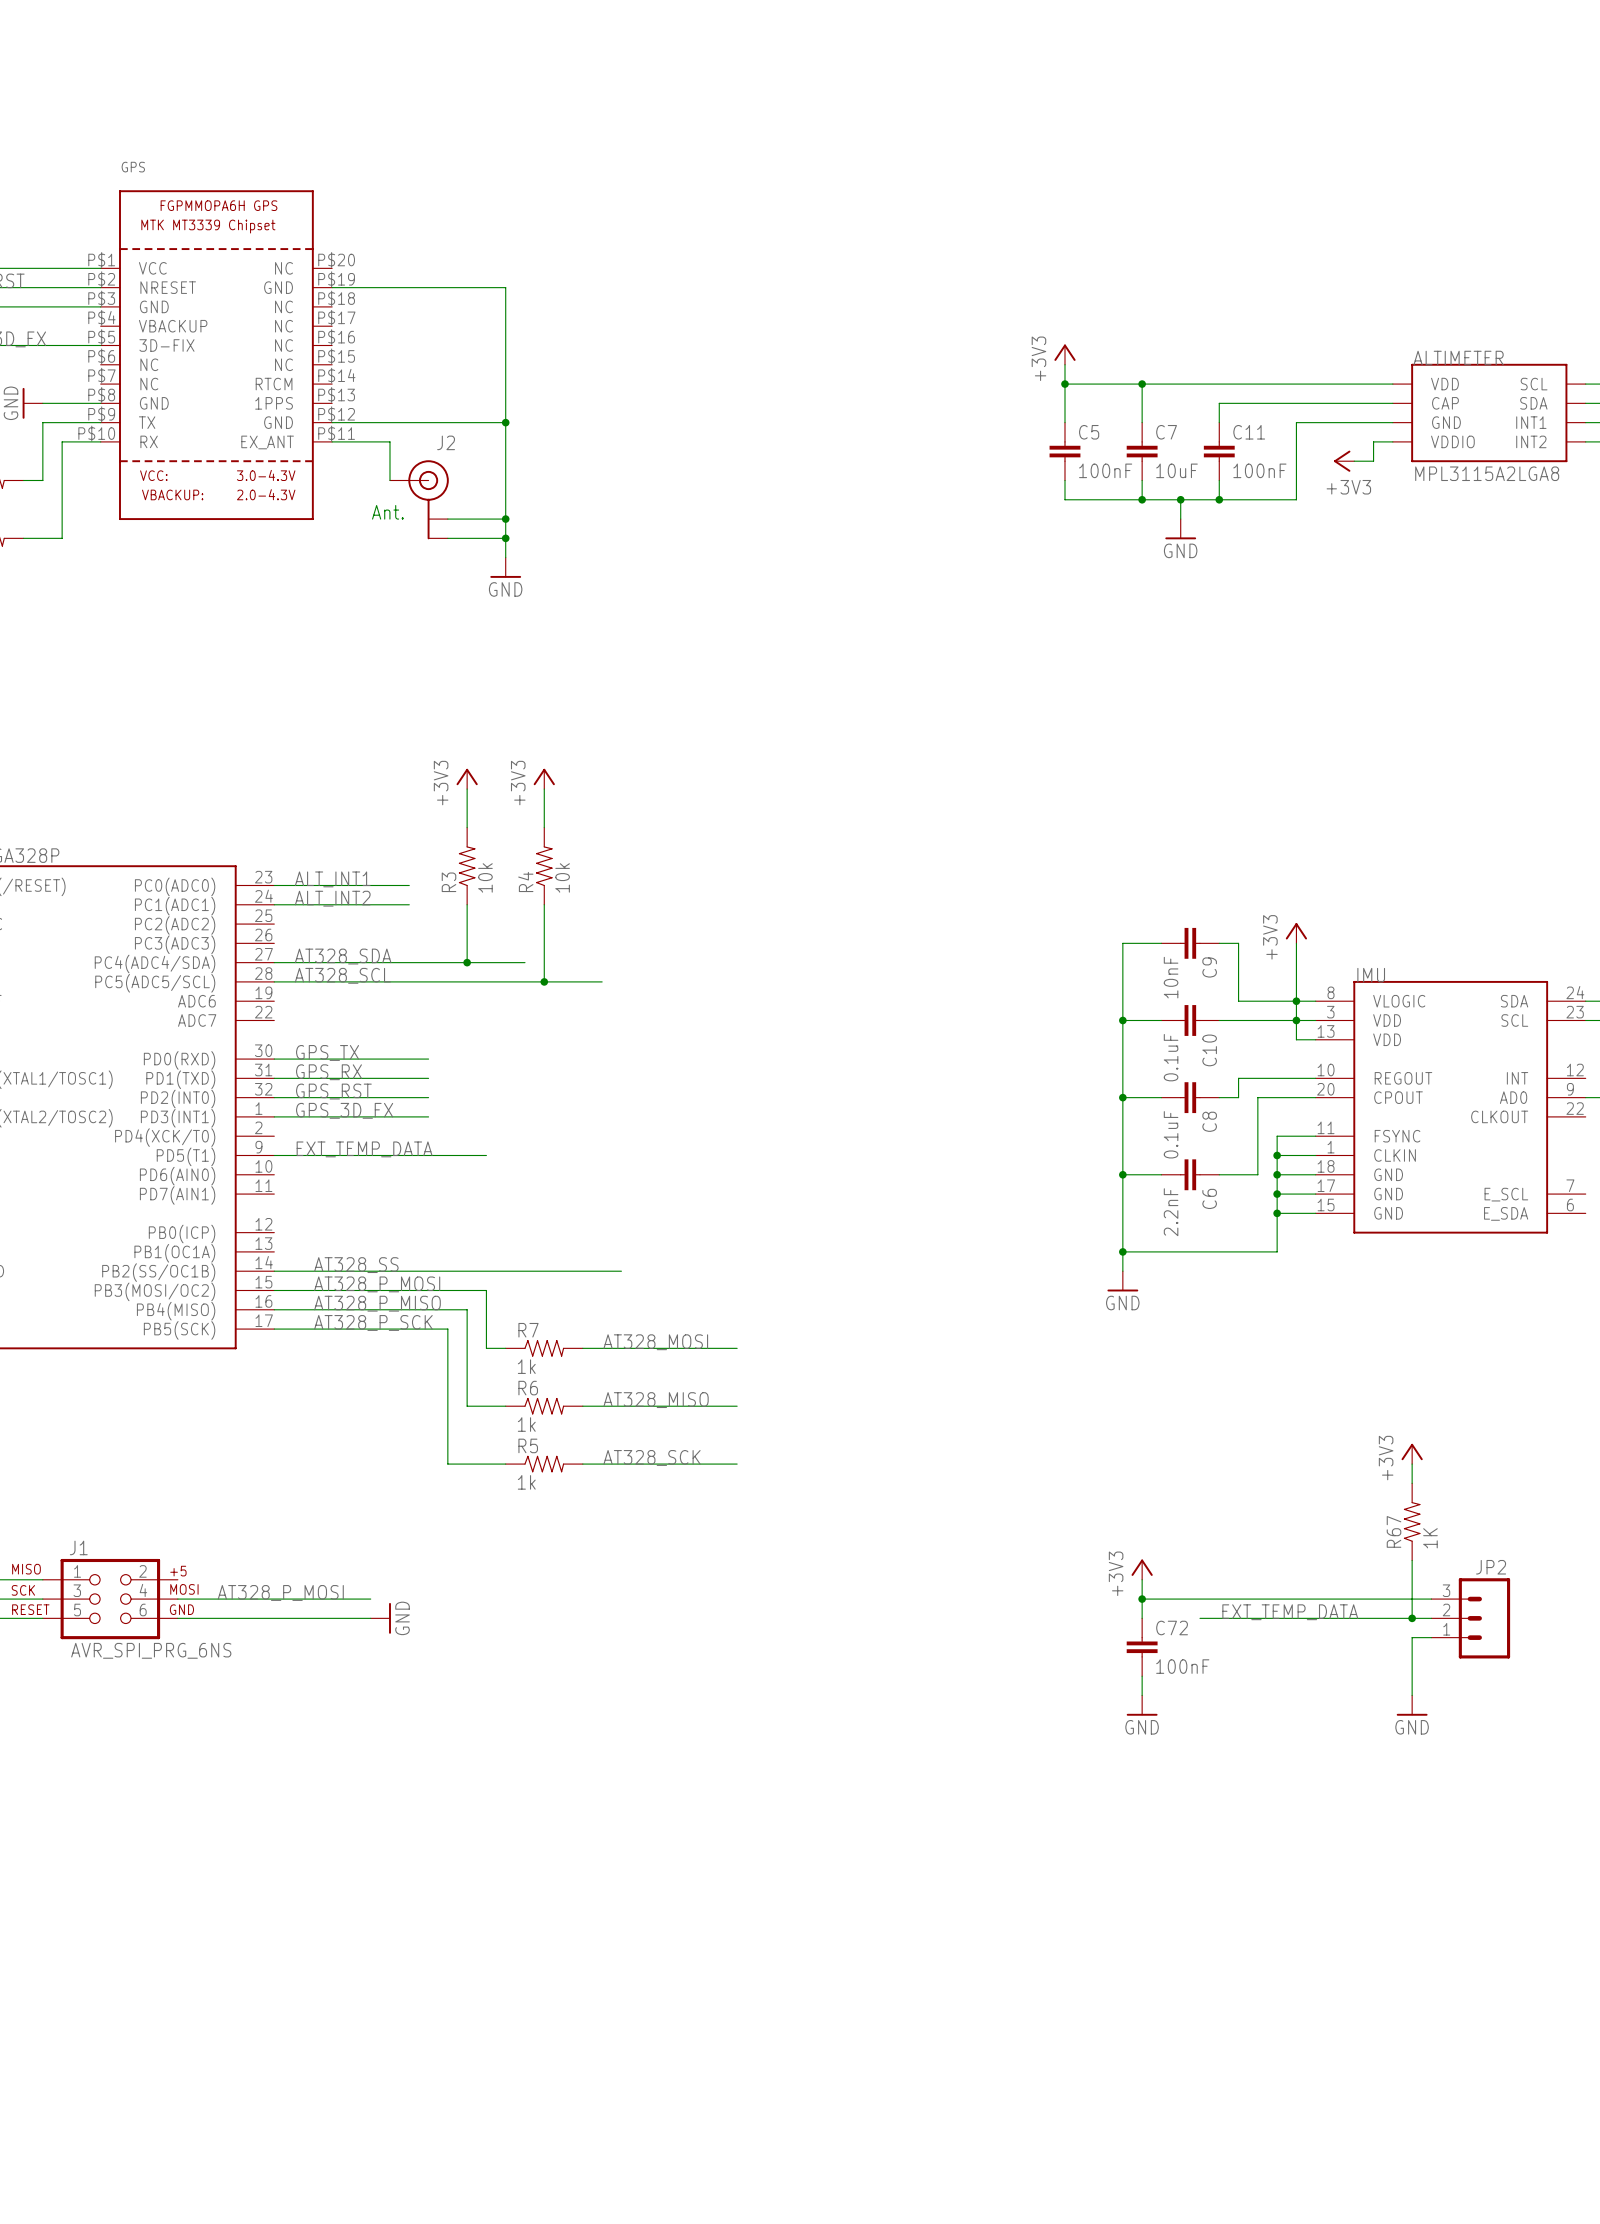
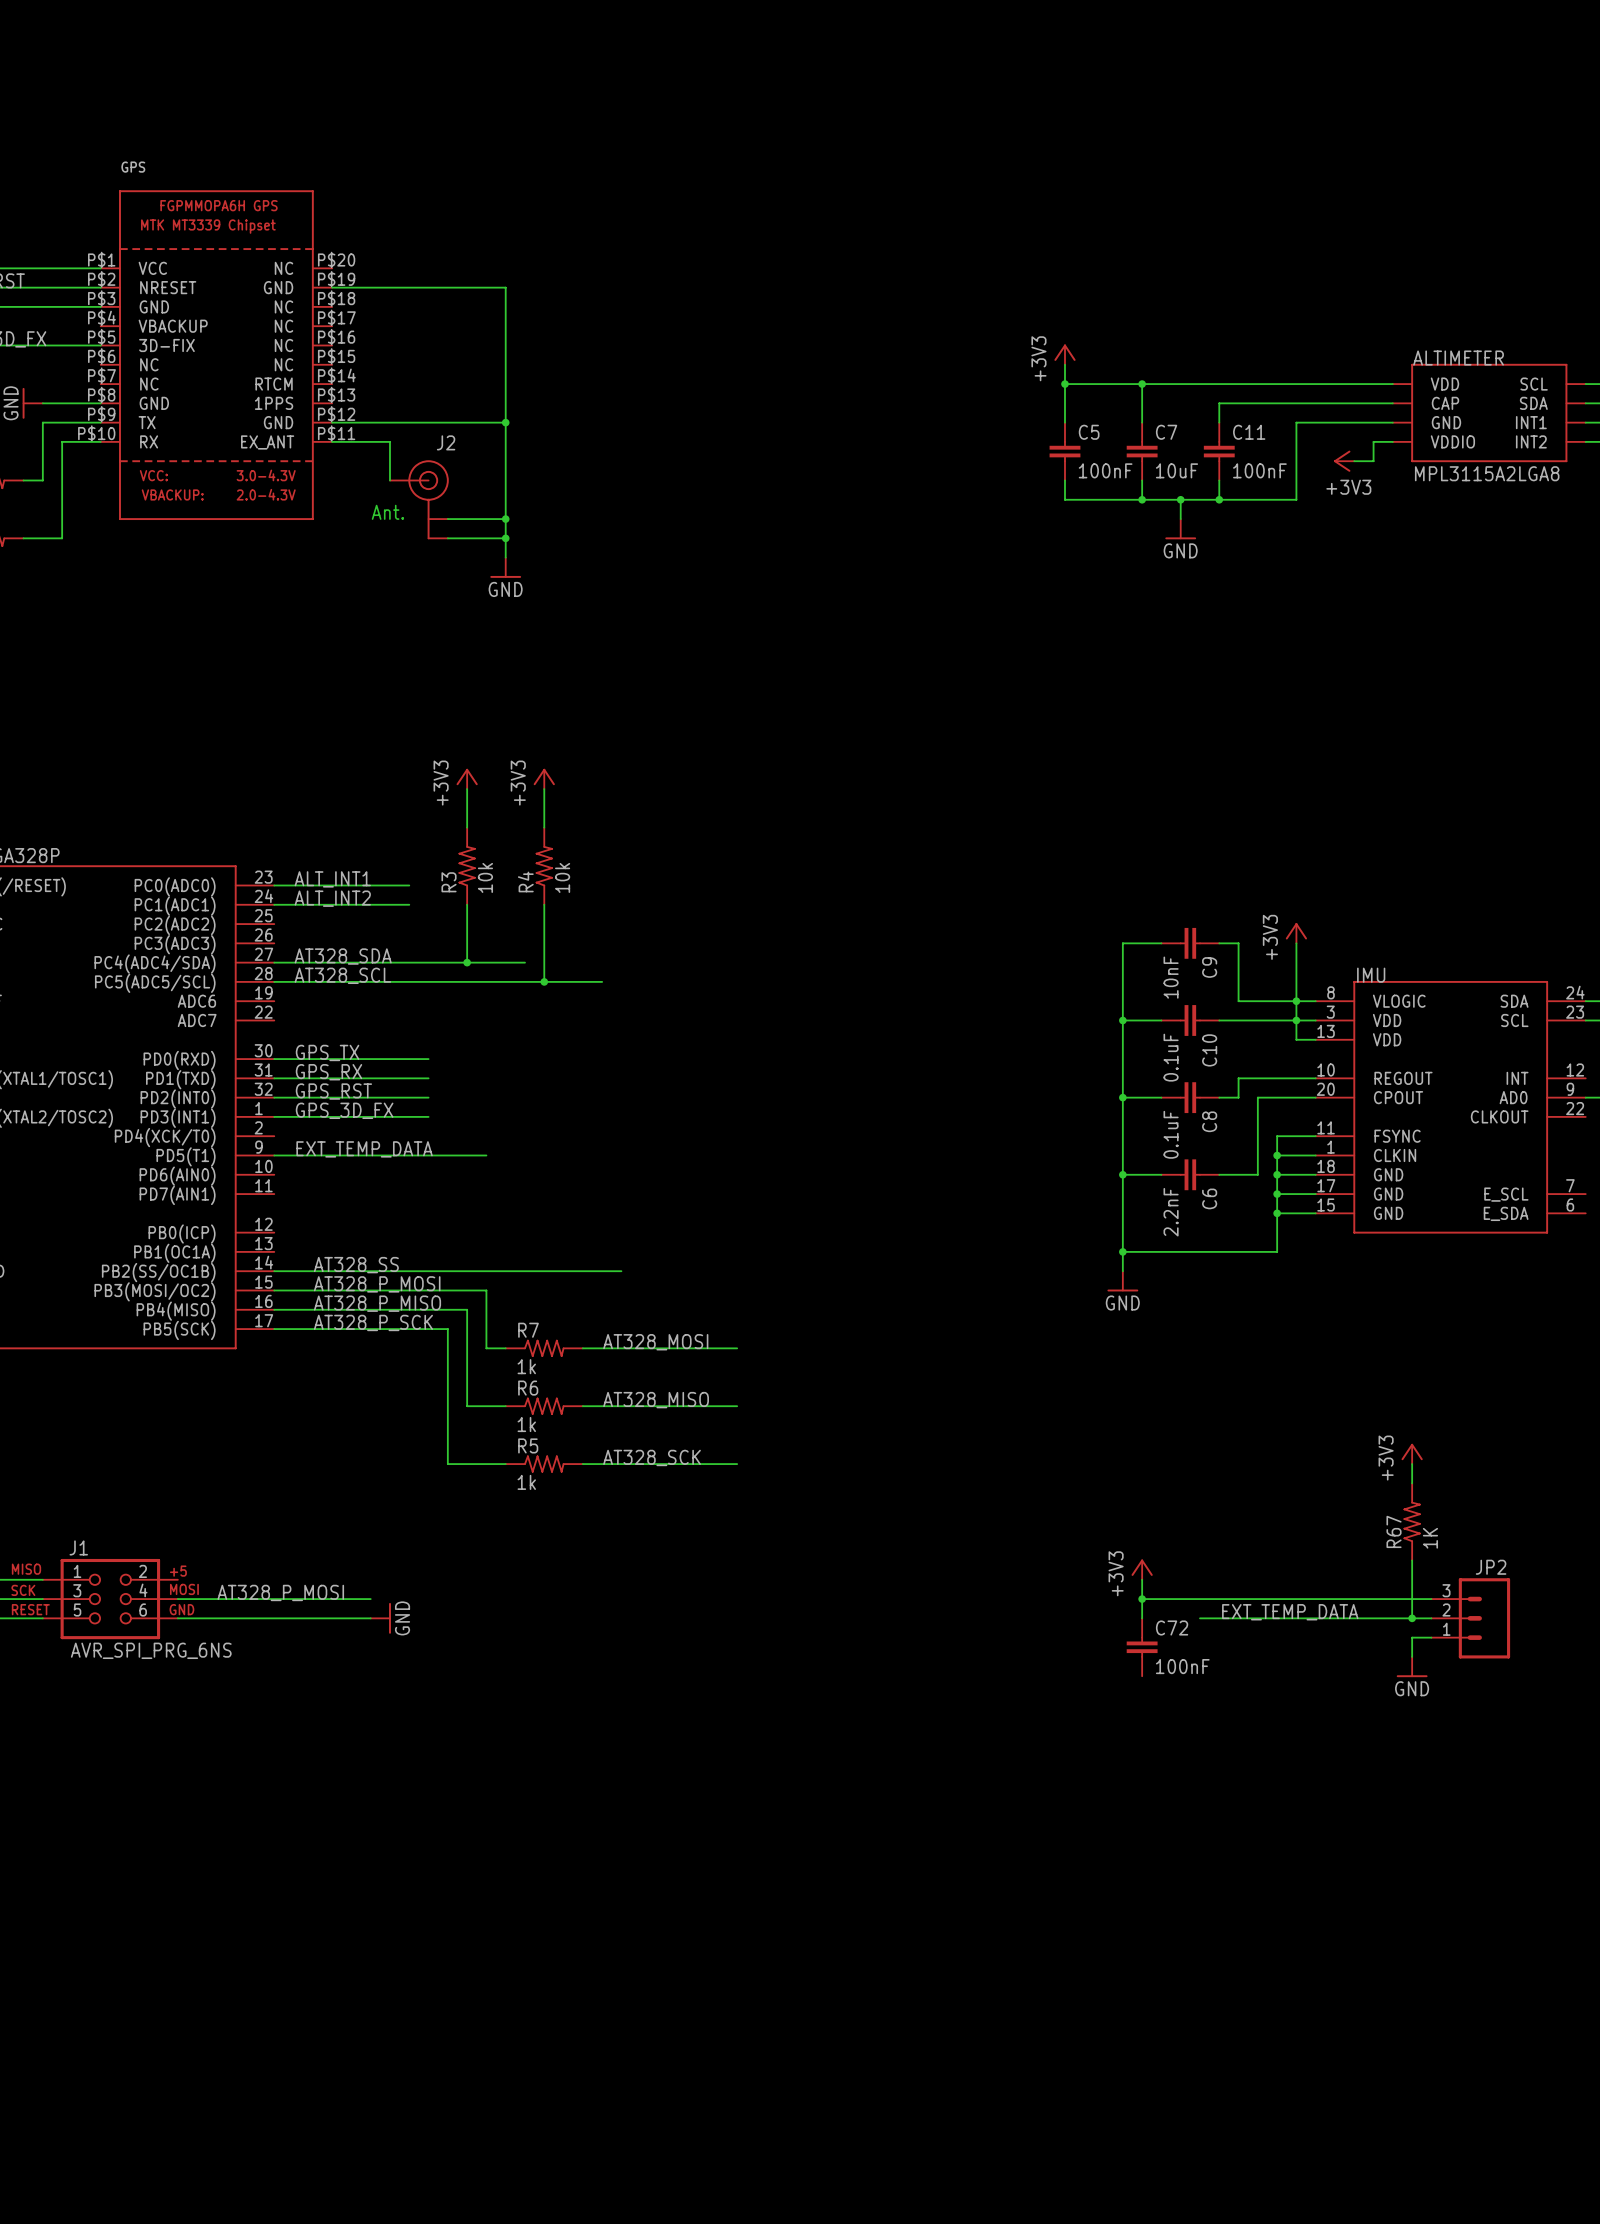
wire: (1142, 1676) (1142, 1695) -> none
power symbol: GND (1142, 1705) -> none
power symbol position: GND (1412, 1705) -> GND (1412, 1667)

